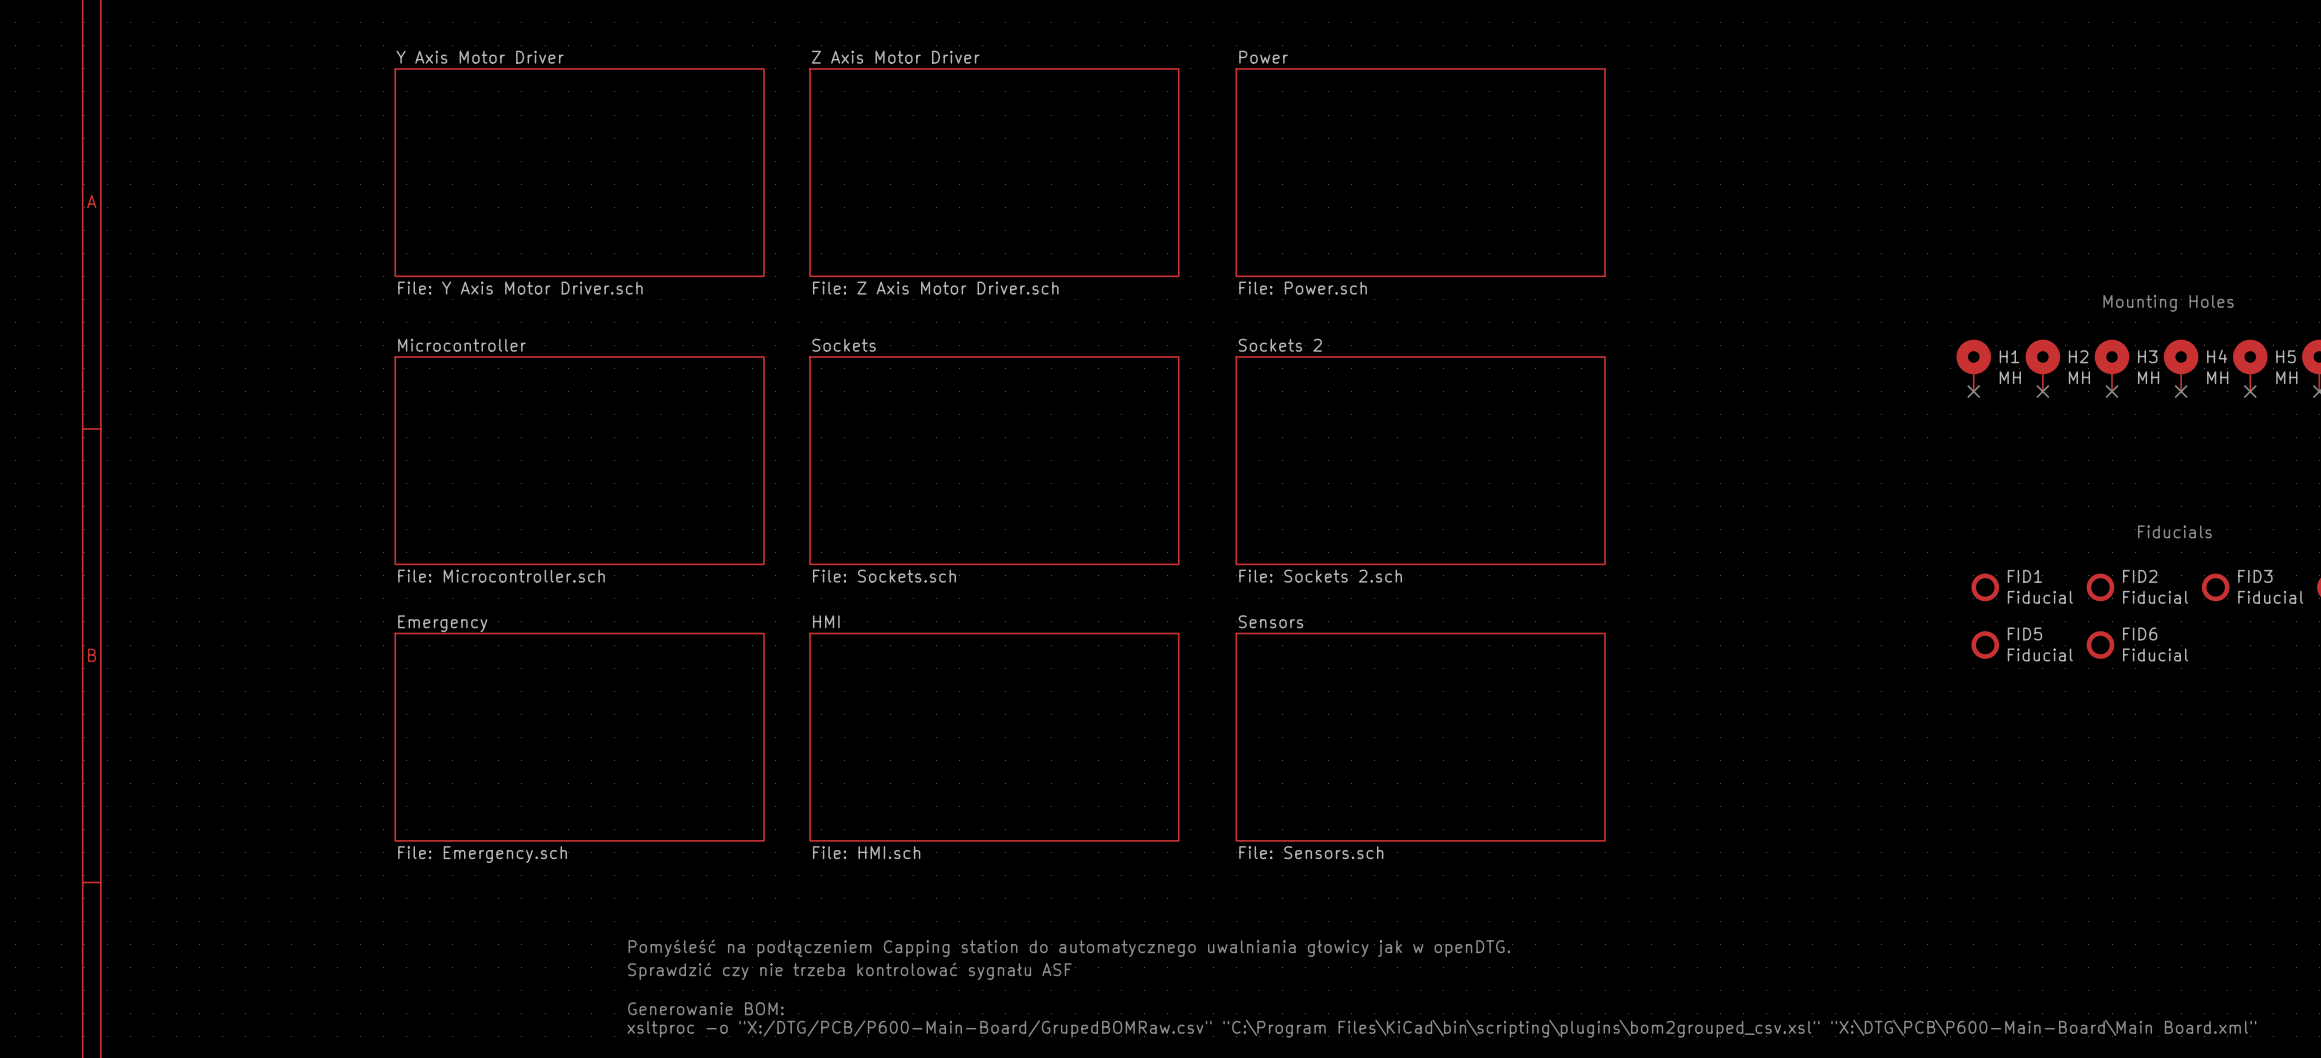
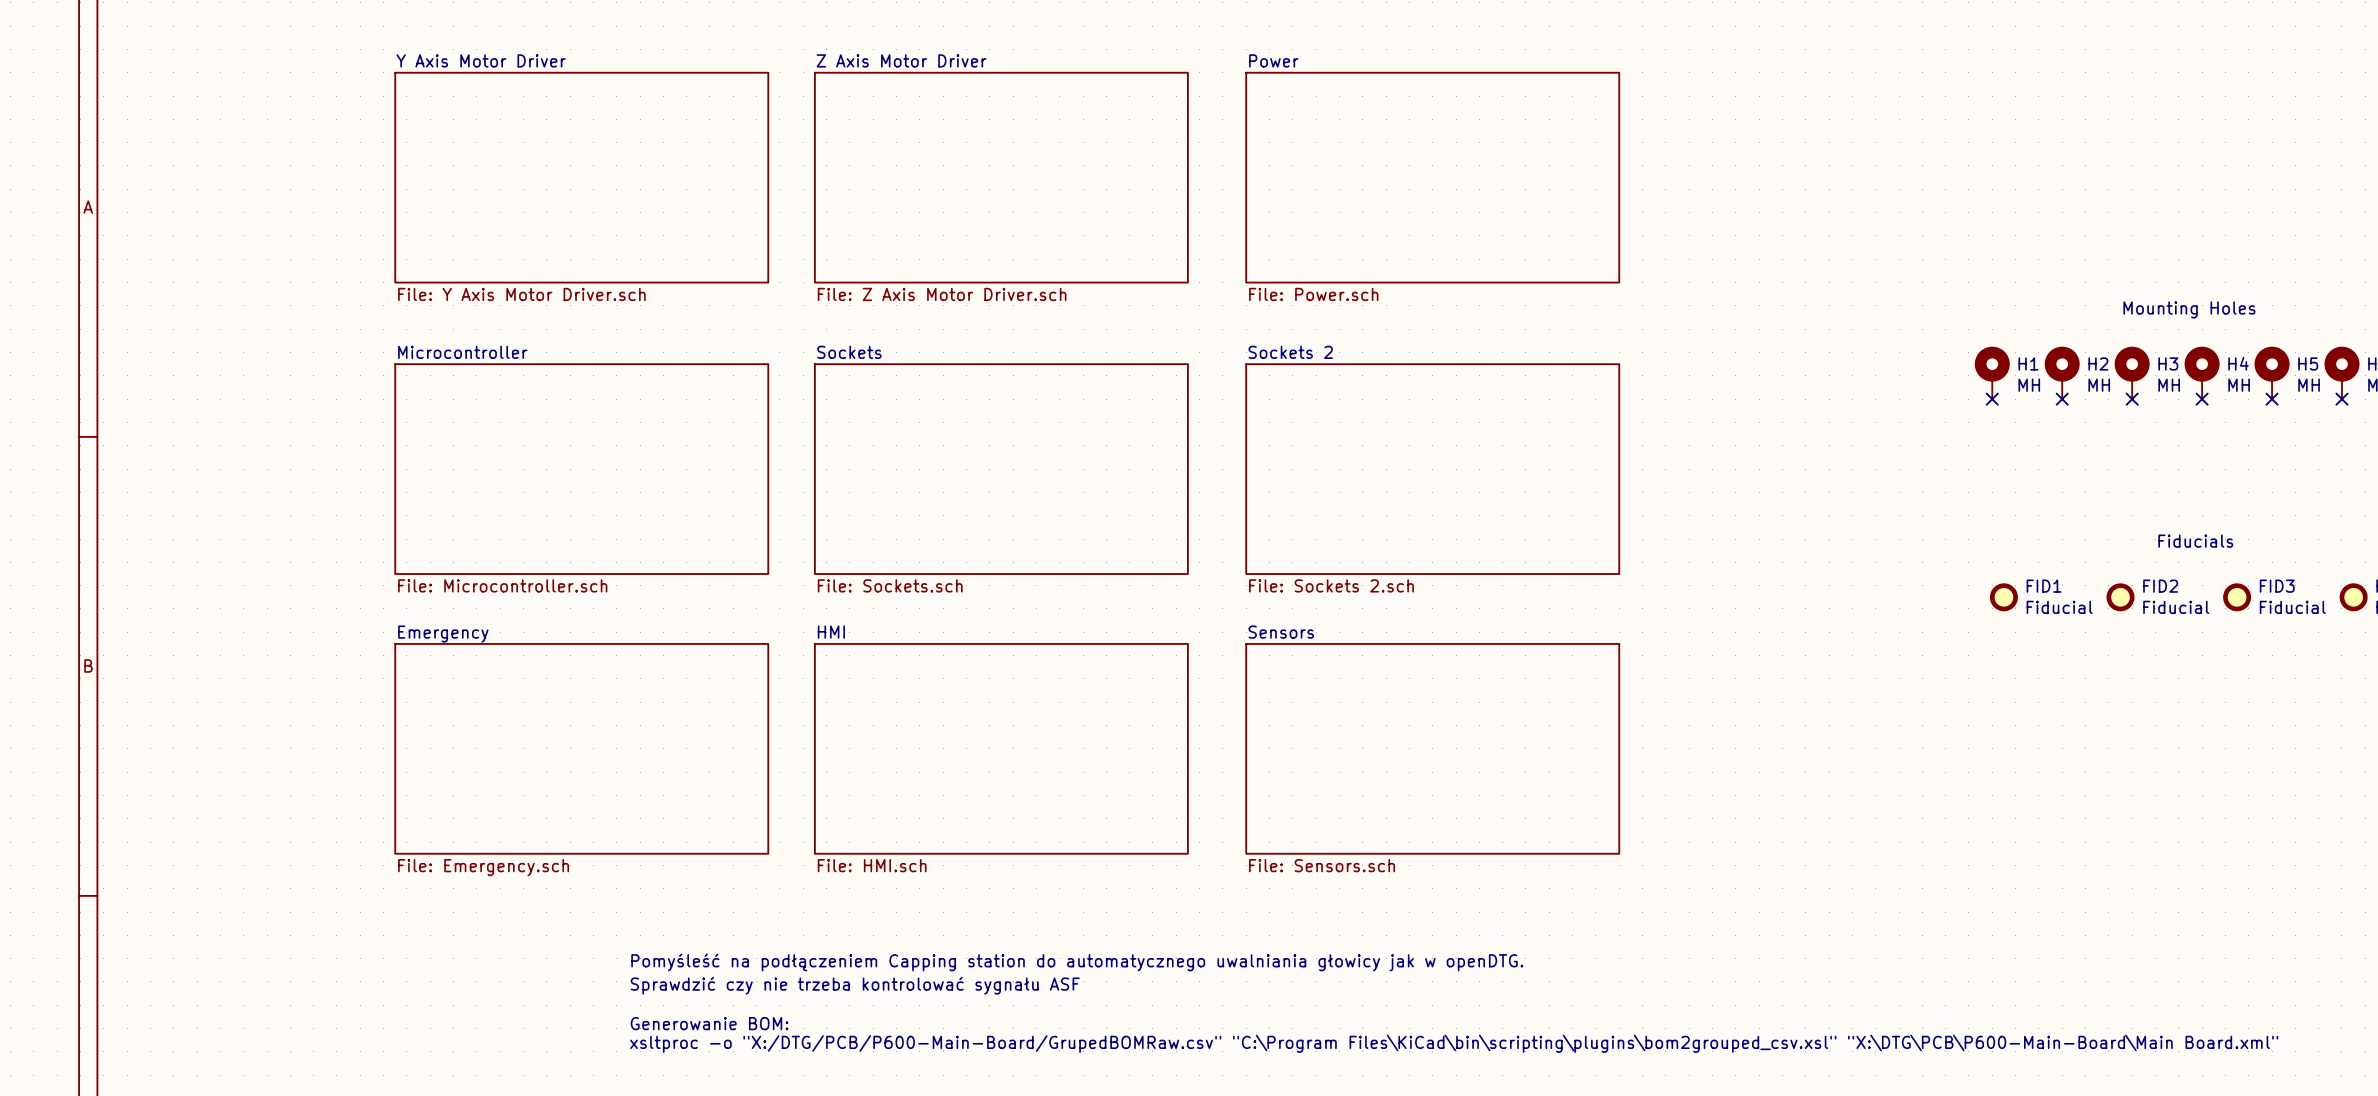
FID5: Fiducial (1985, 645) -> none
FID6: Fiducial (2100, 645) -> none

